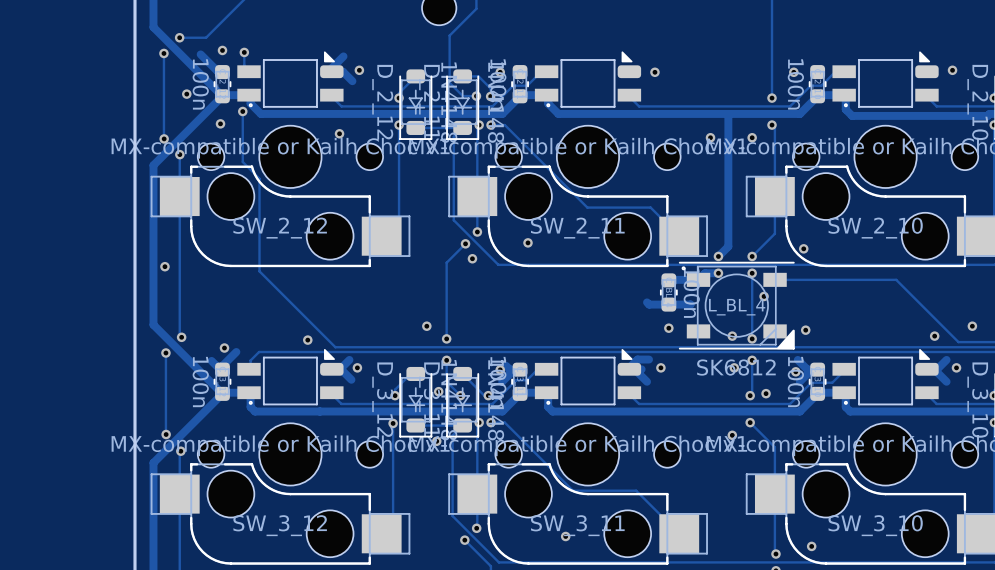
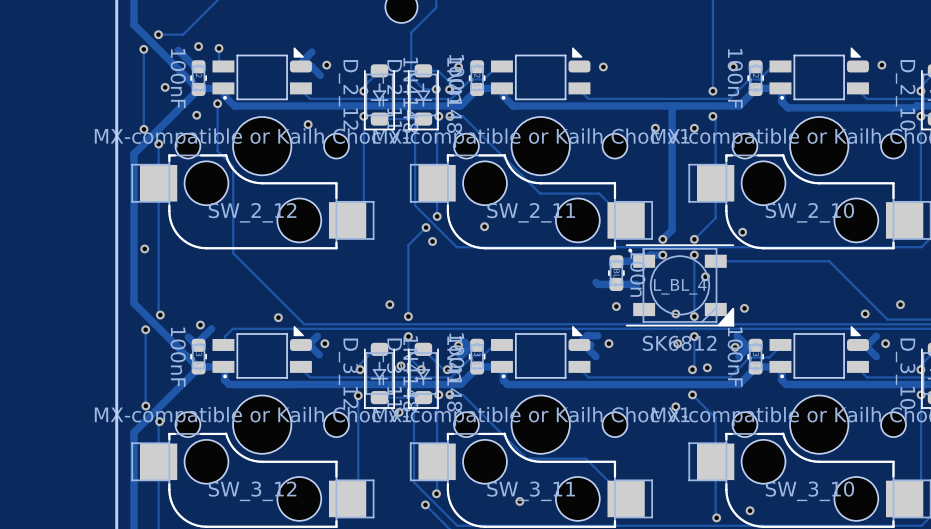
part value: 100n (200, 84) -> 100nF (178, 78)
part value: 100n (795, 84) -> 100nF (735, 78)
part value: 100n (200, 382) -> 100nF (178, 357)
part value: 100n (795, 382) -> 100nF (735, 357)

